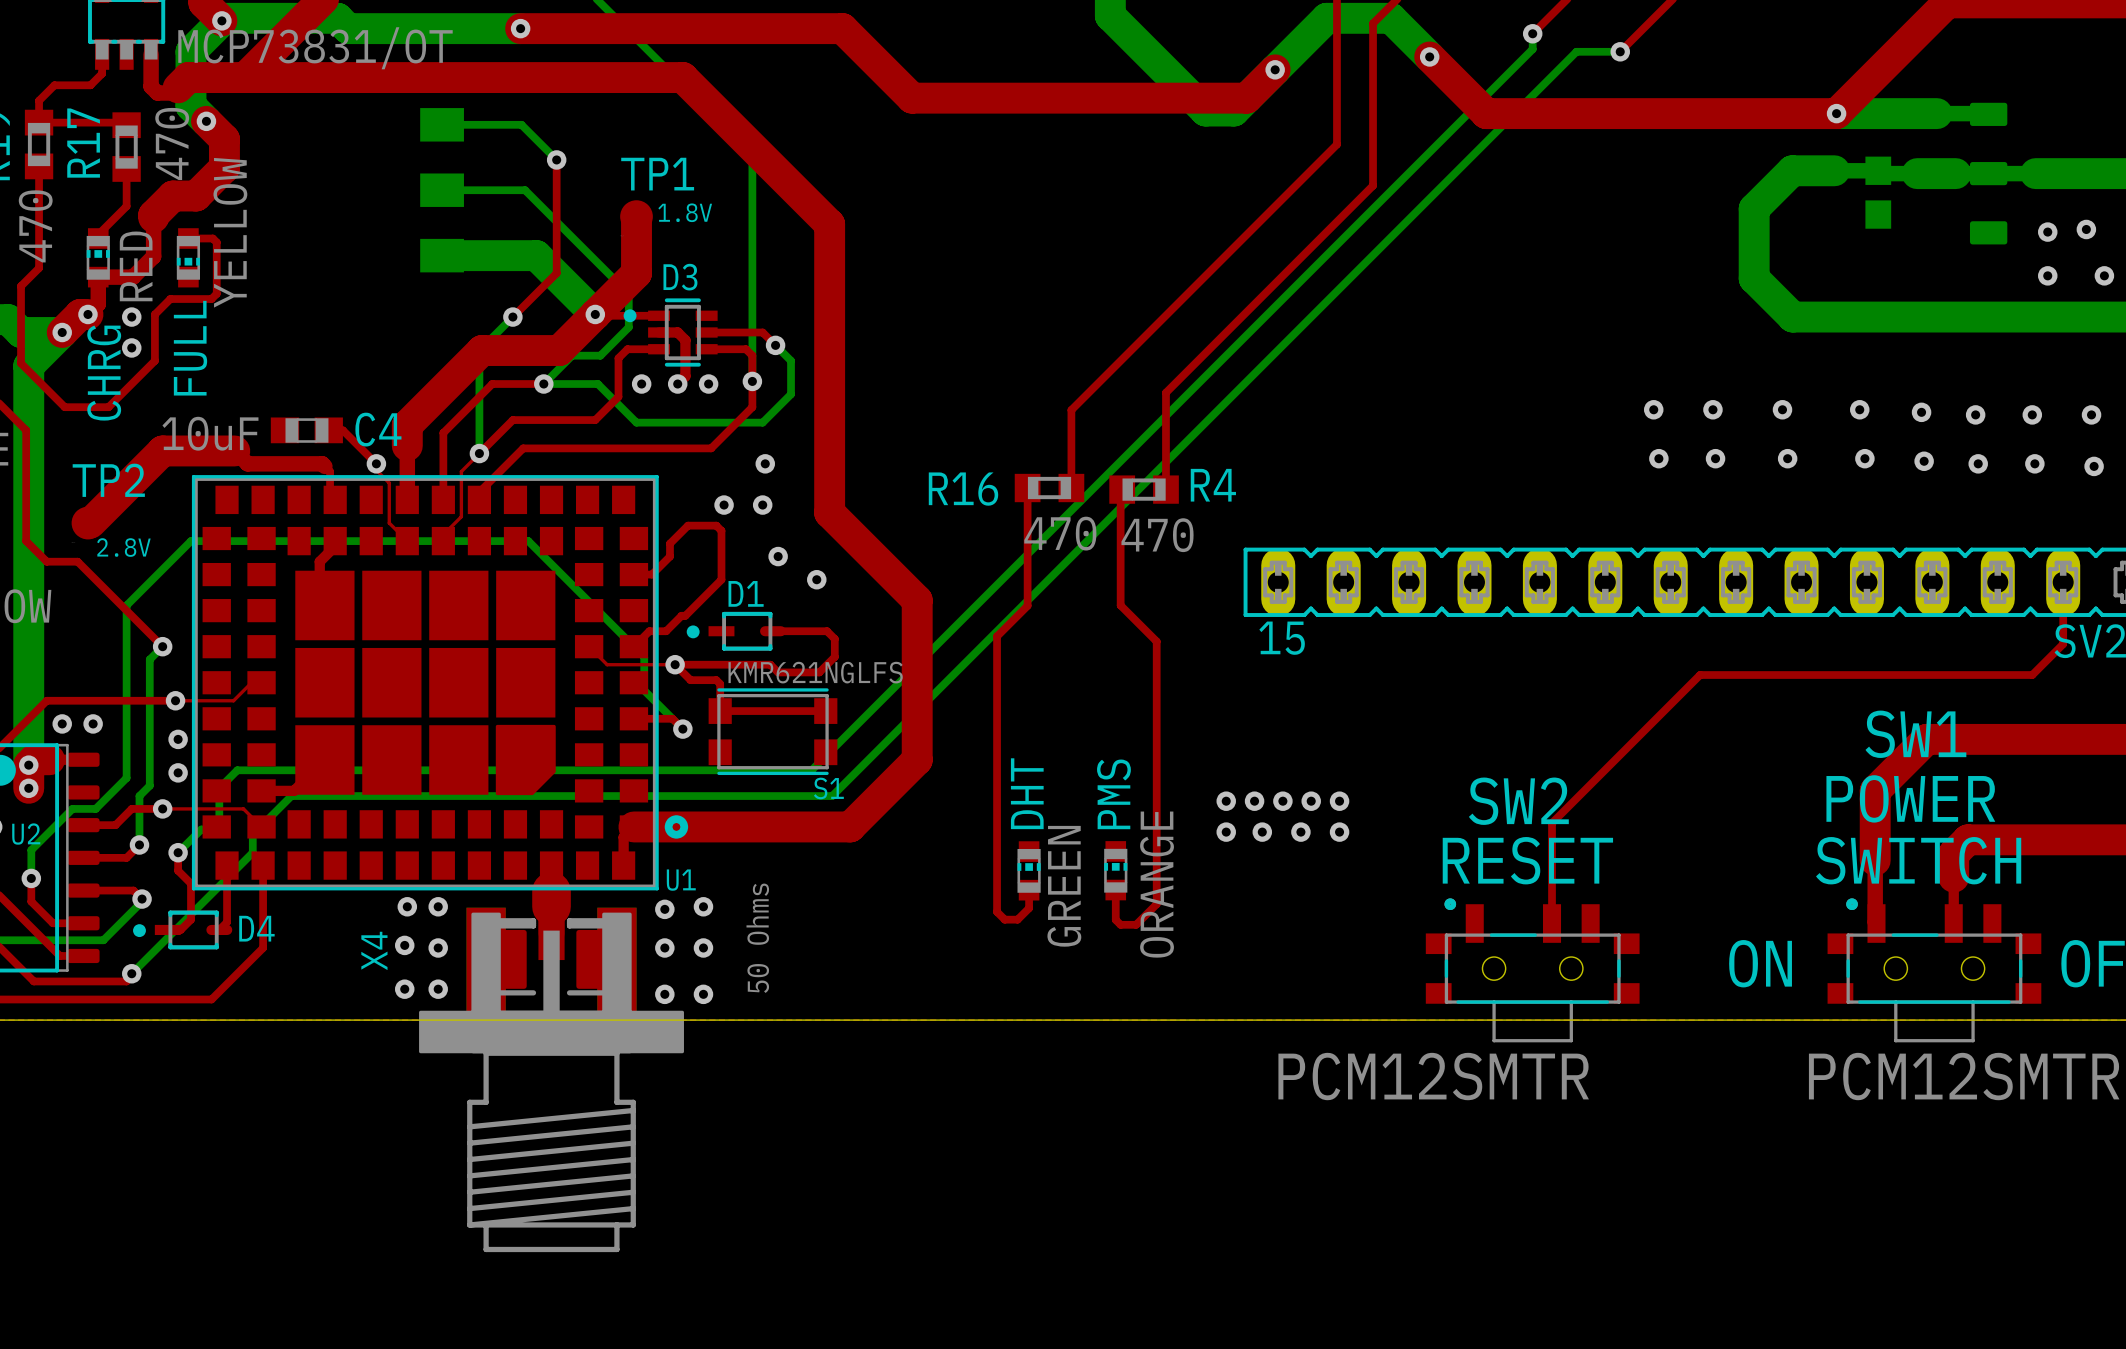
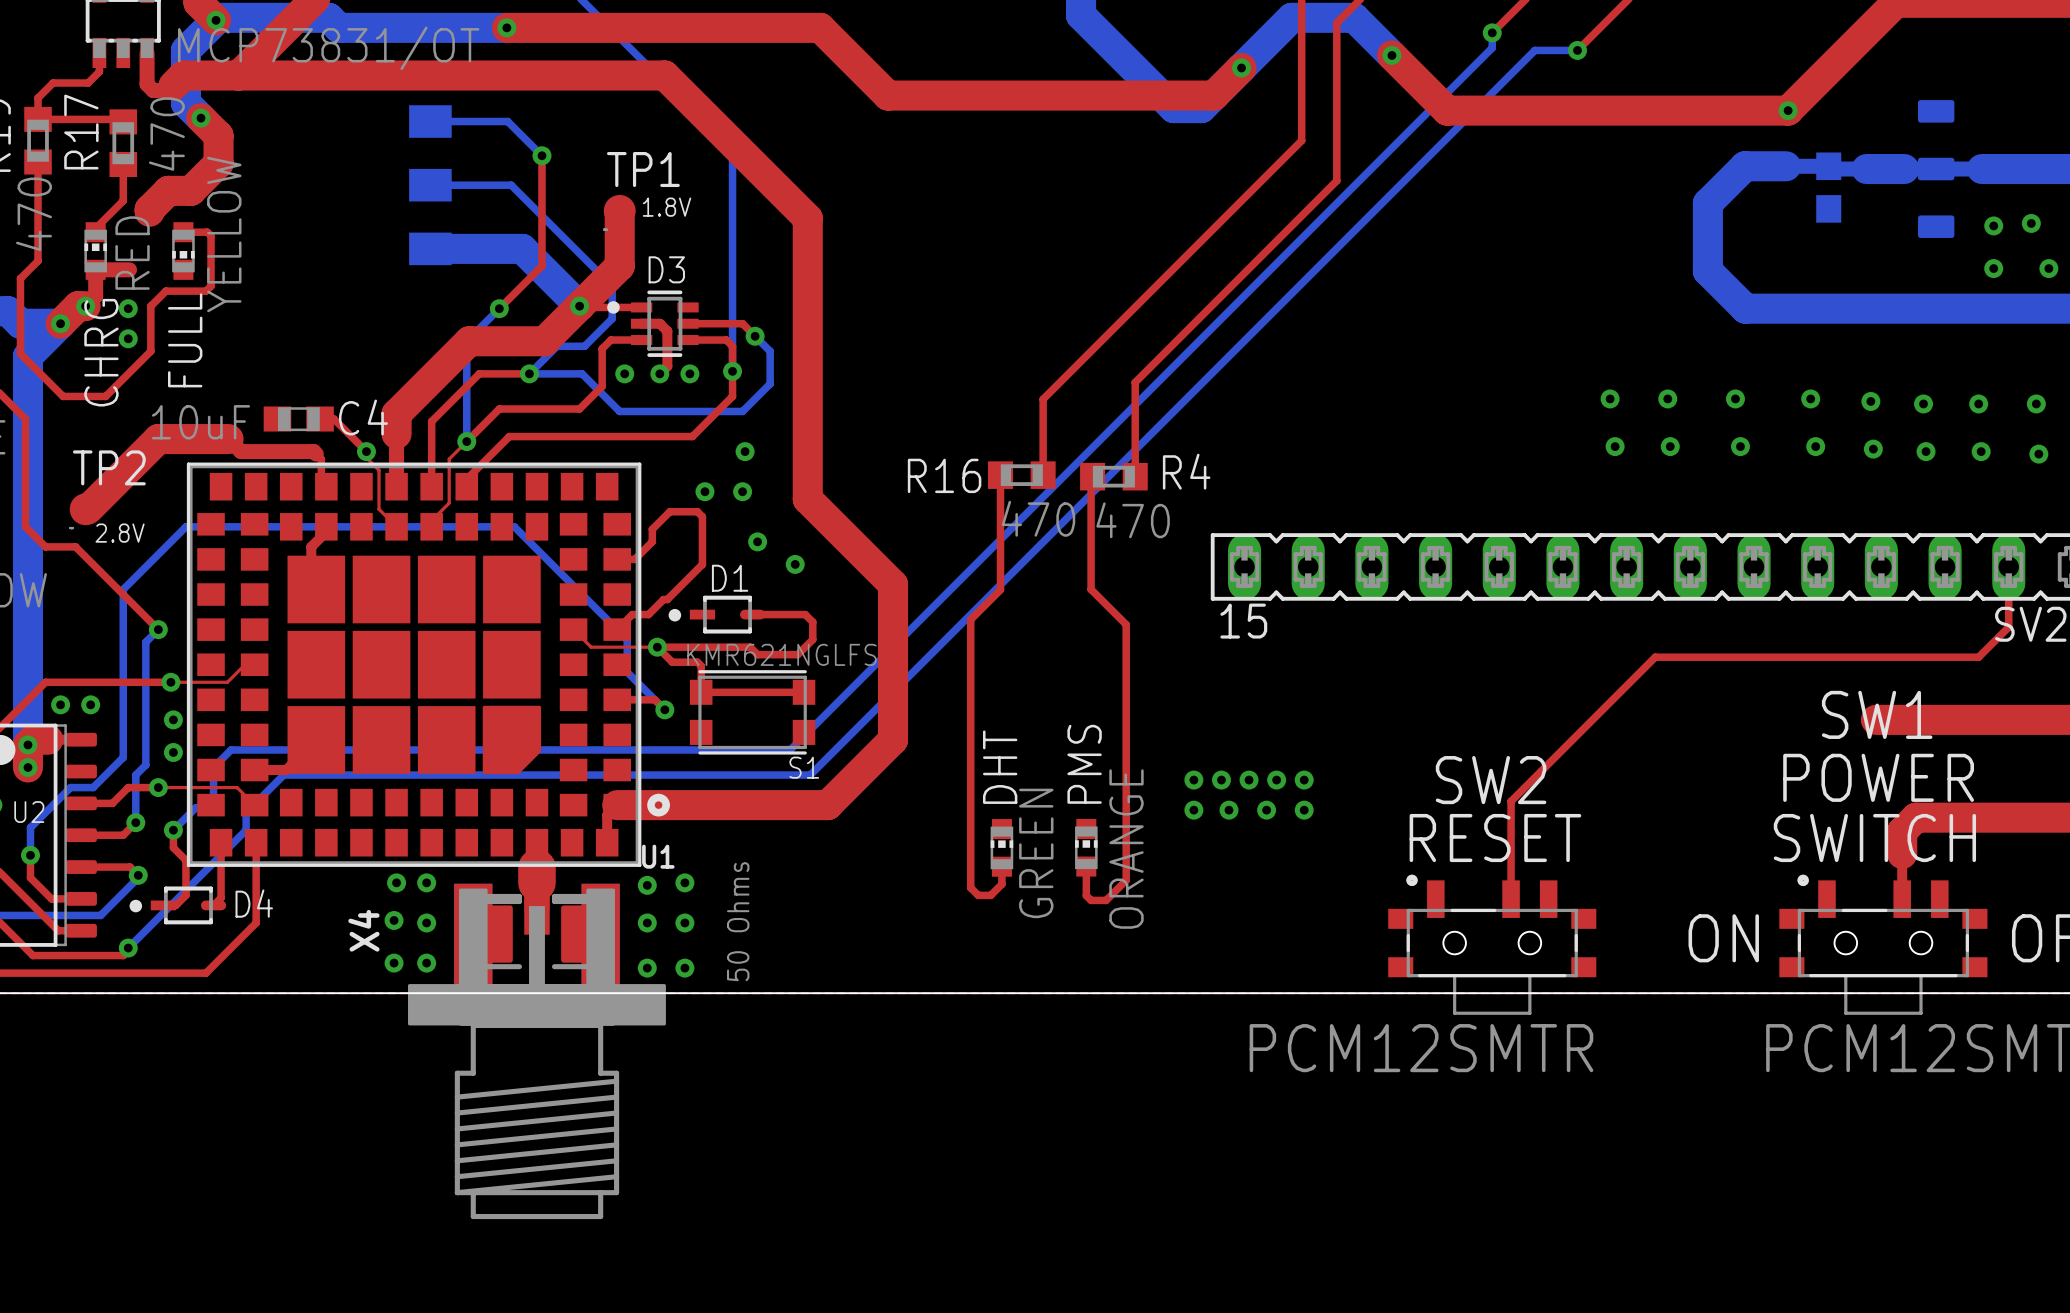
bottom track: (1836, 113) (1988, 114) -> none
top track: (153, 217) (153, 256) (133, 277) -> none
top track: (1926, 739) (1875, 790) (1876, 923) -> none

